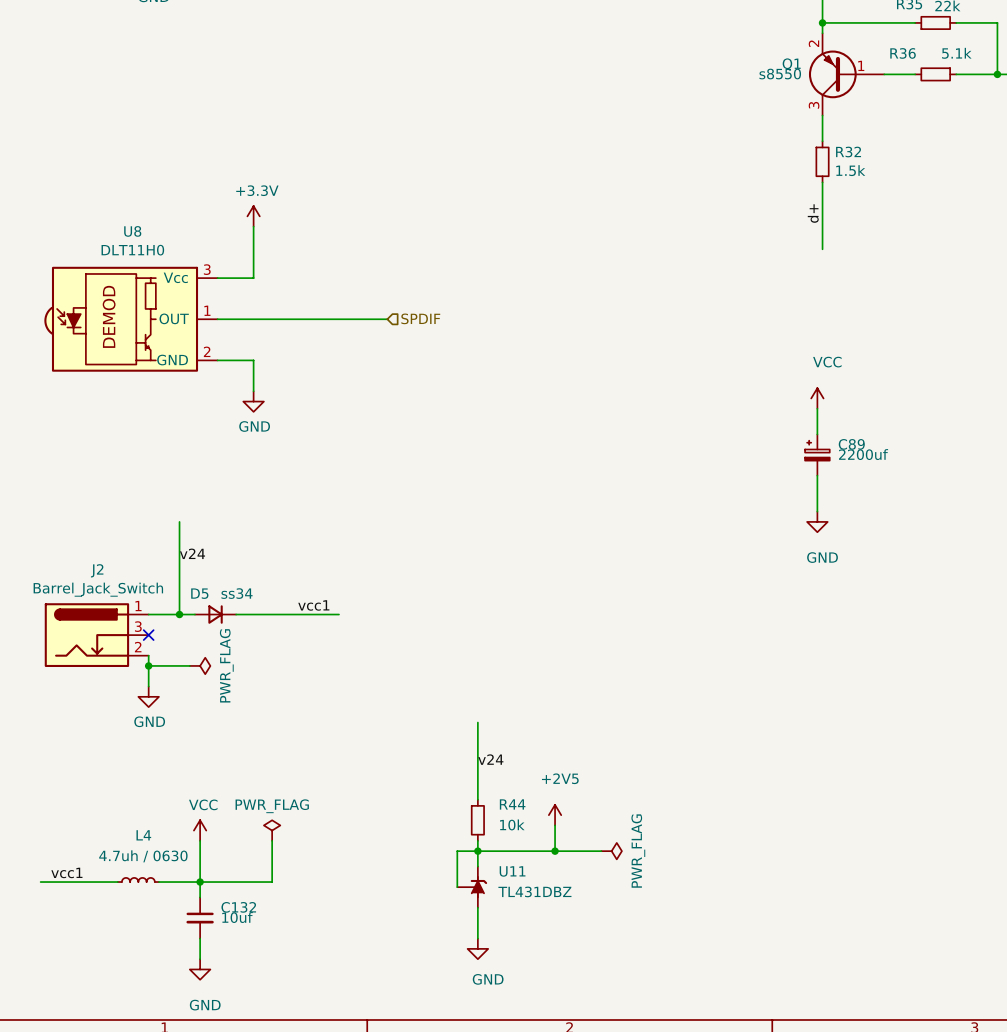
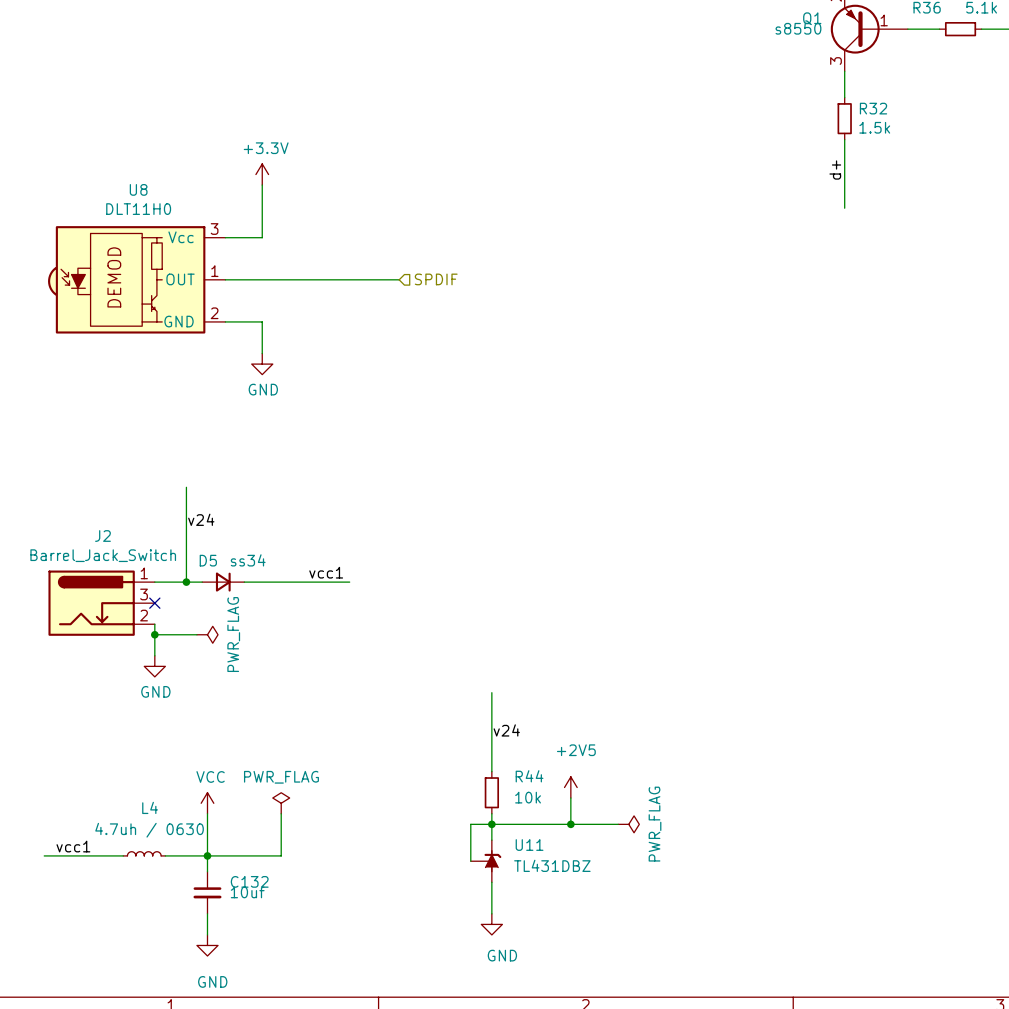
power symbol: VCC (817, 398) -> none
wire: (817, 408) (817, 434) -> none
C89: 2200uf (817, 455) -> none
wire: (817, 475) (817, 511) -> none
power symbol: GND (817, 521) -> none

